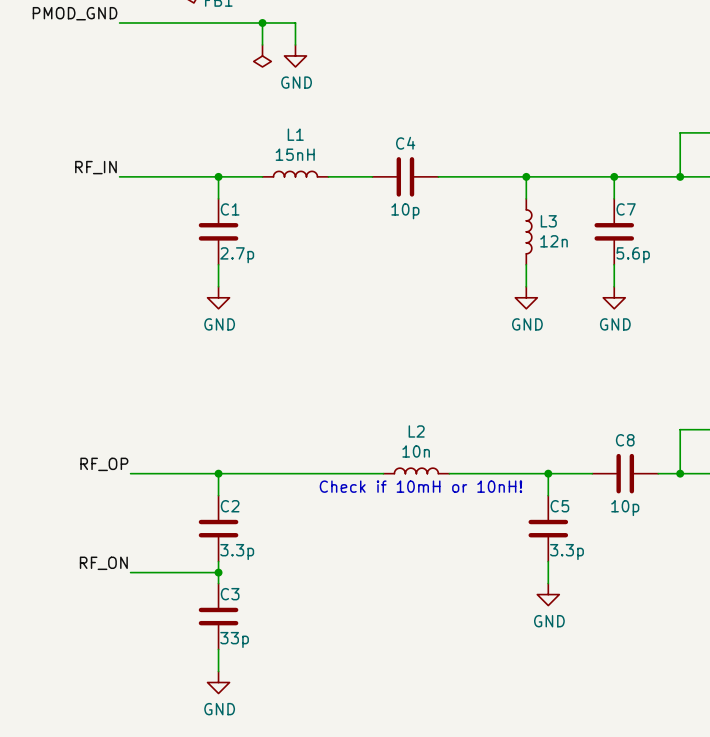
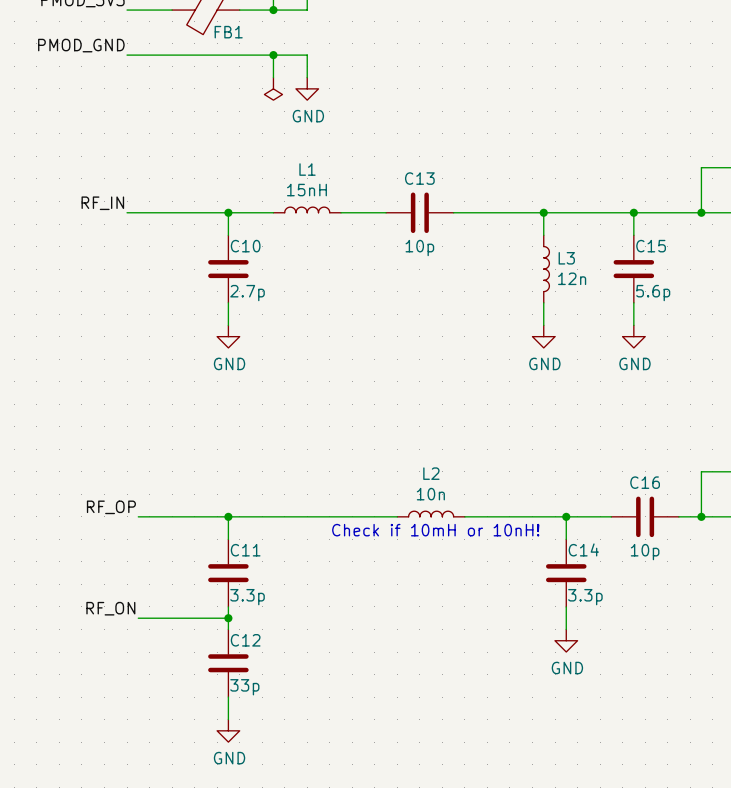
C4 name: C4 (405, 143) -> C13 (419, 178)
C1 name: C1 (230, 209) -> C10 (245, 246)
C7 name: C7 (626, 209) -> C15 (651, 246)
C8 name: C8 (625, 440) -> C16 (645, 482)
C2 name: C2 (230, 506) -> C11 (245, 550)
C5 name: C5 (559, 506) -> C14 (583, 549)
C3 name: C3 (230, 594) -> C12 (245, 640)

